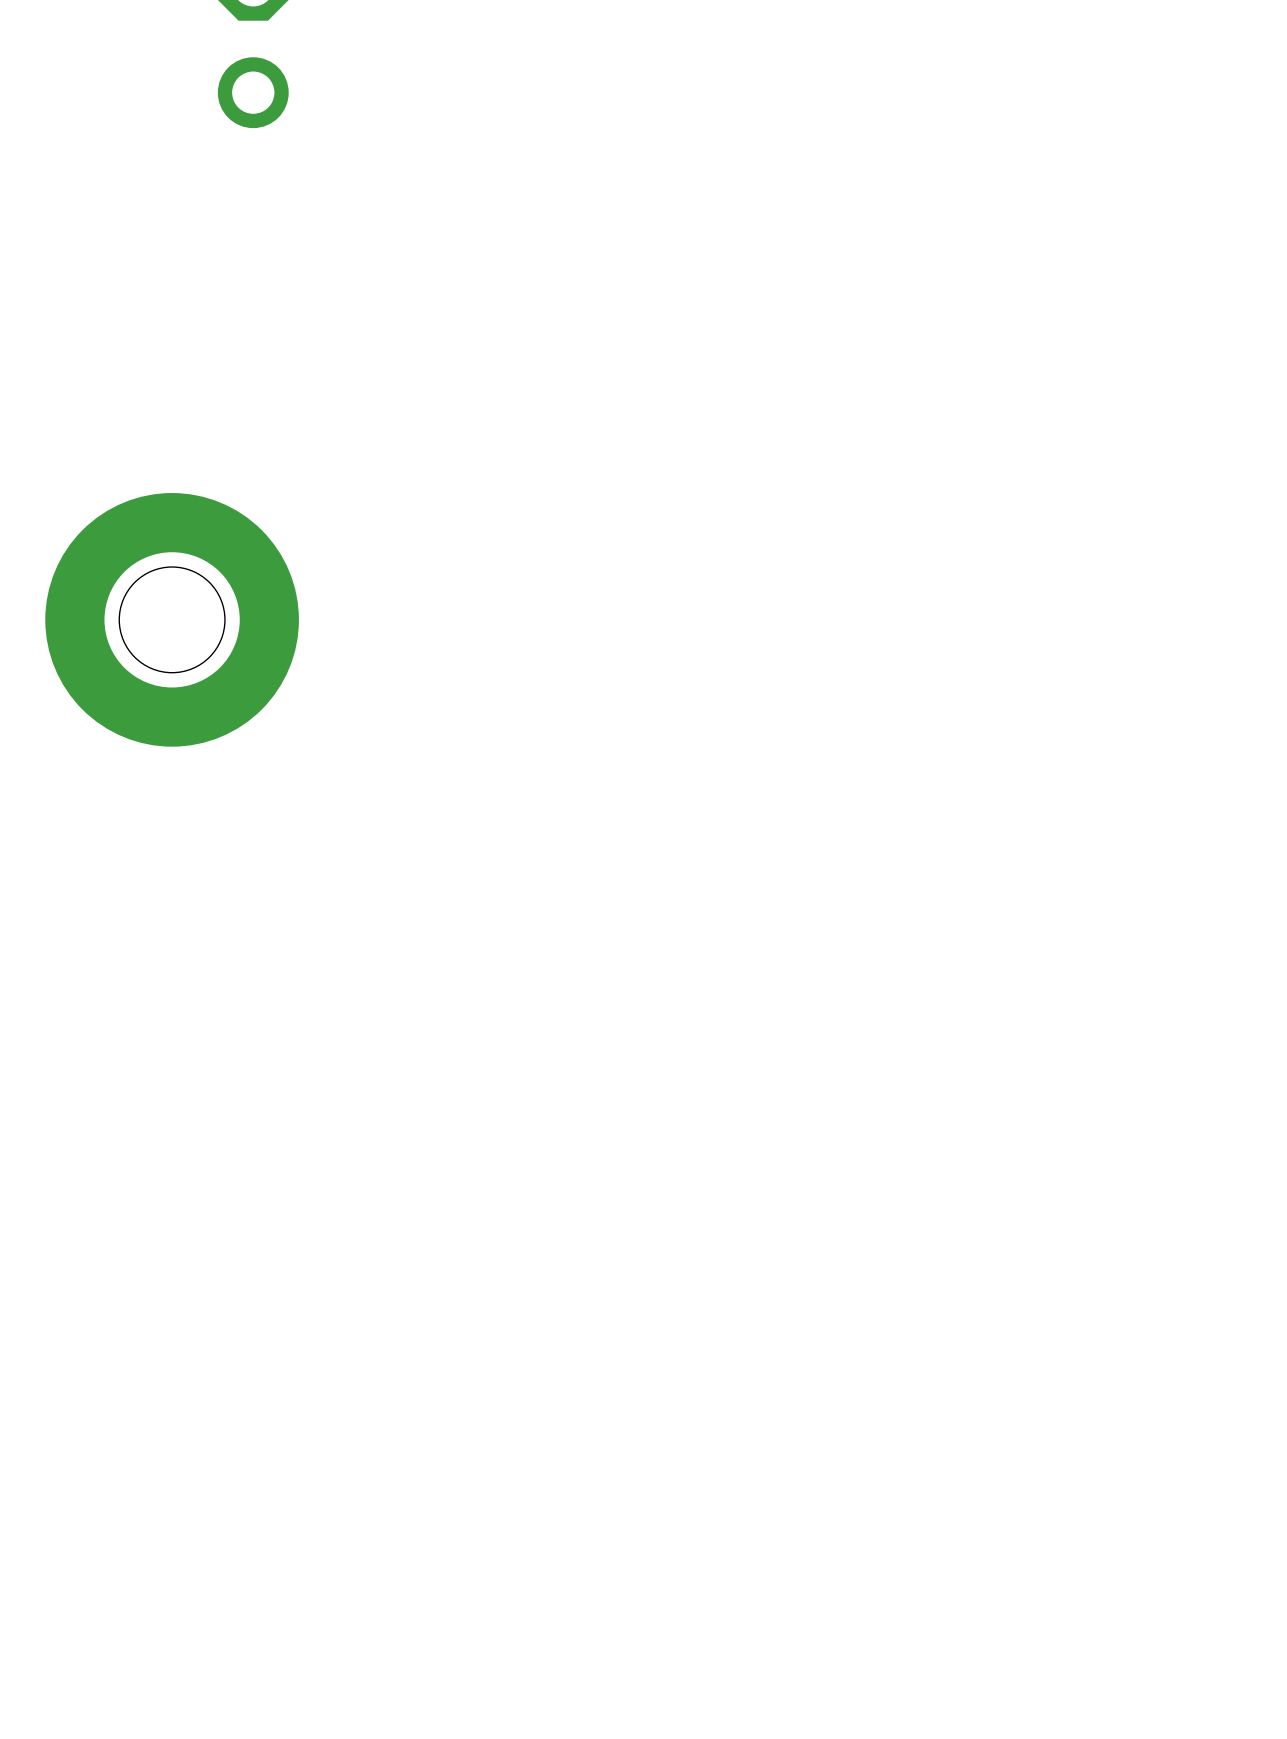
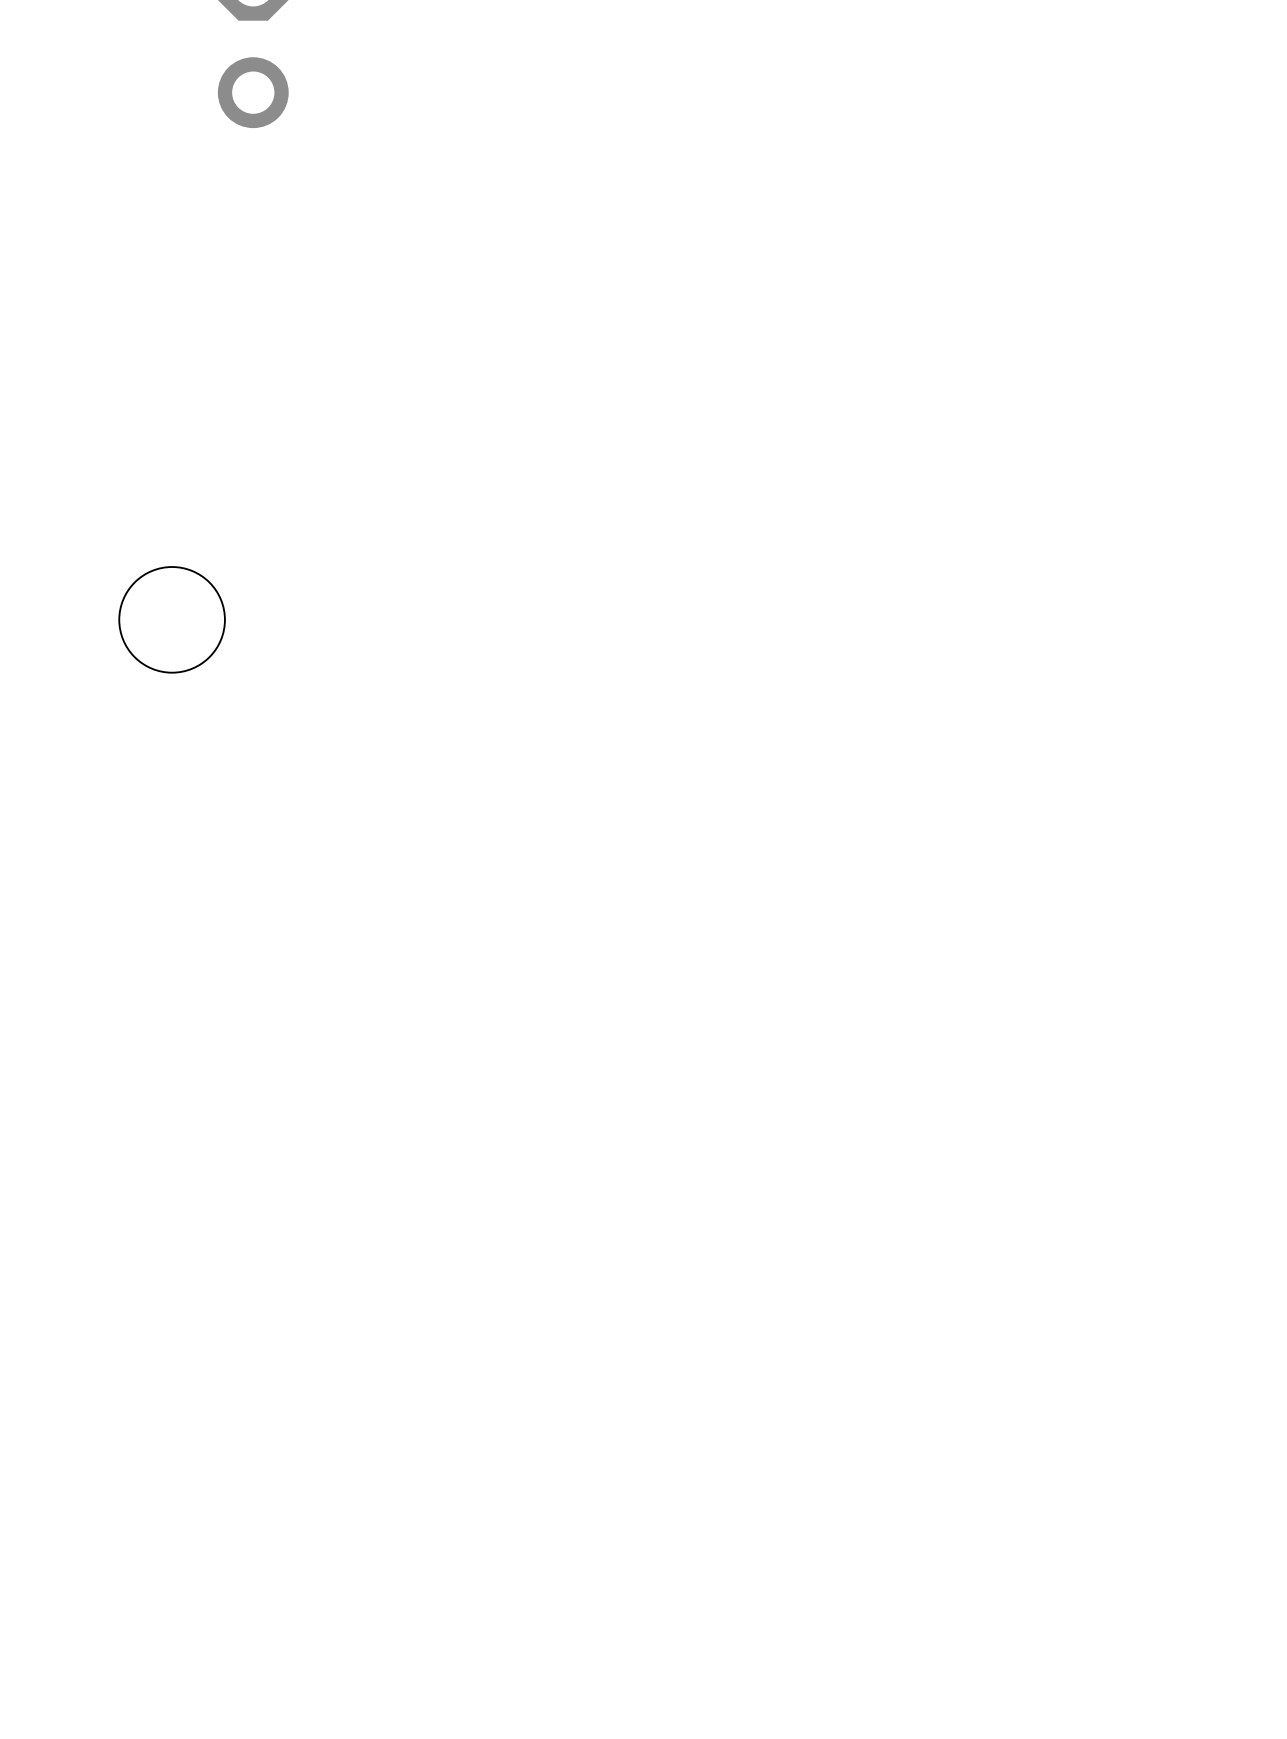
part: (172, 619) -> none

